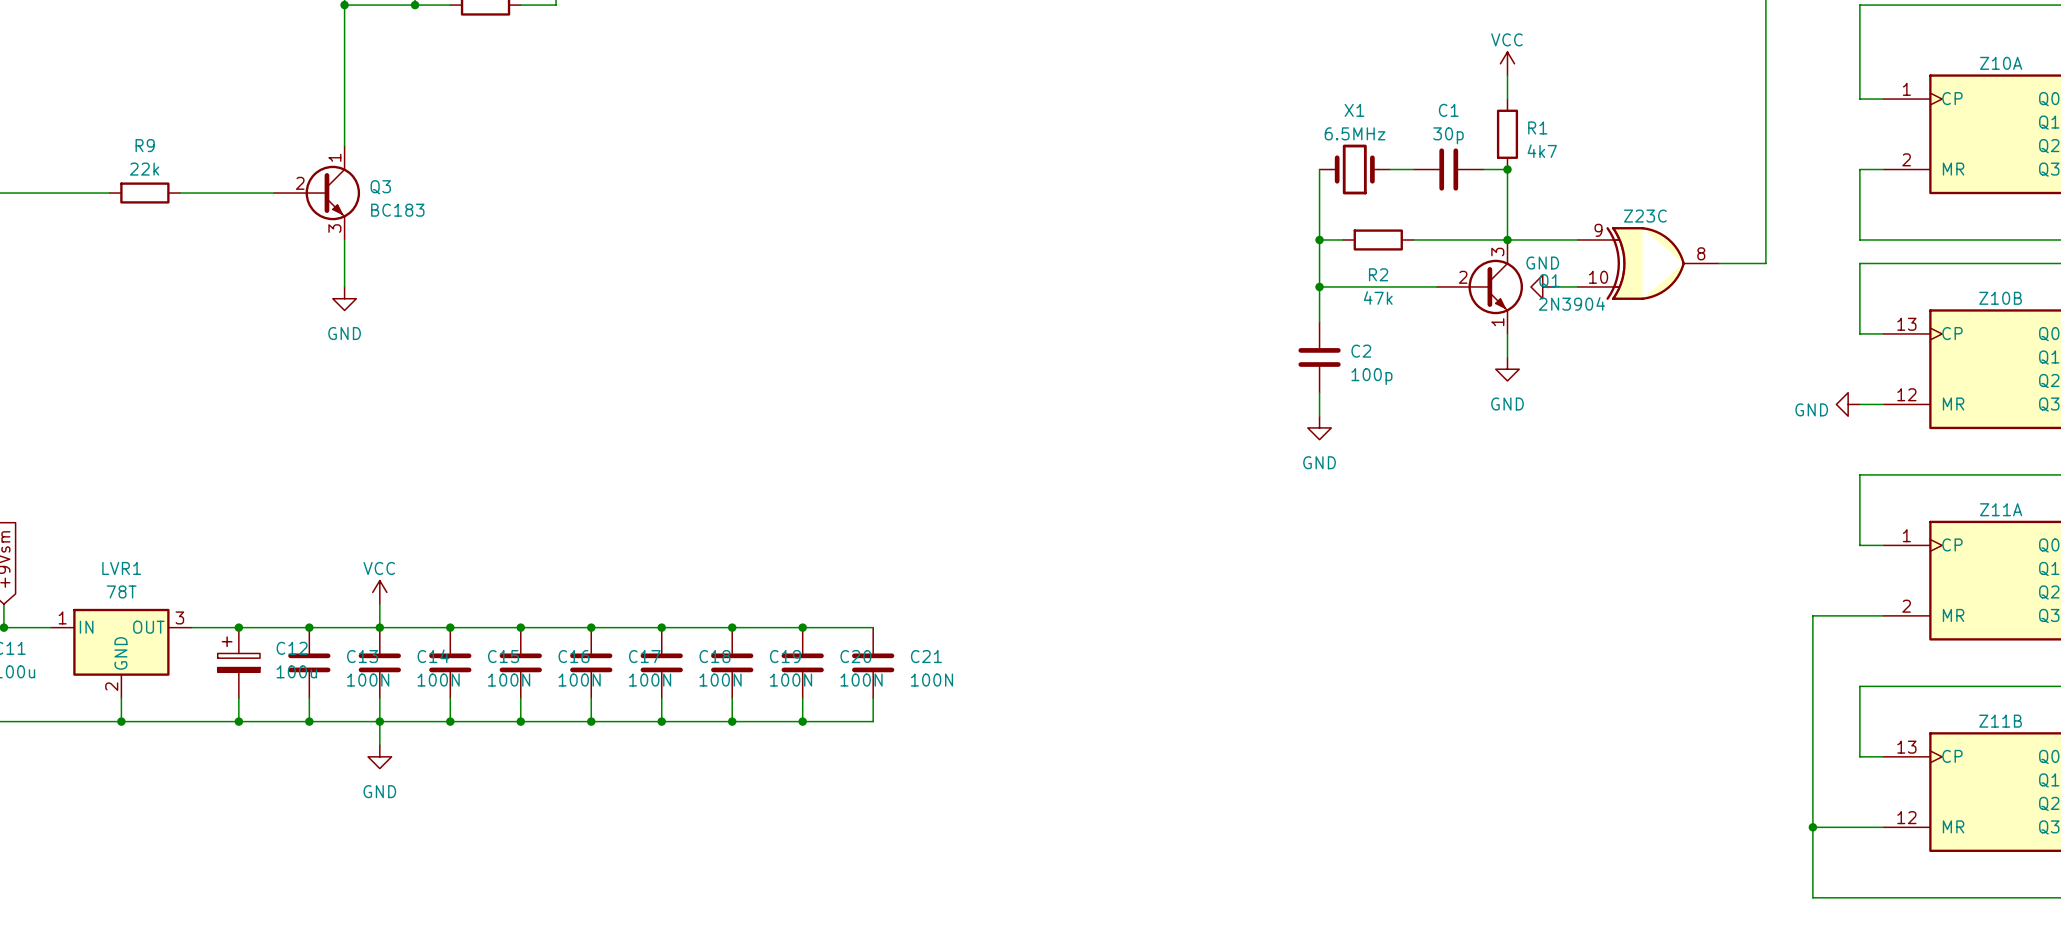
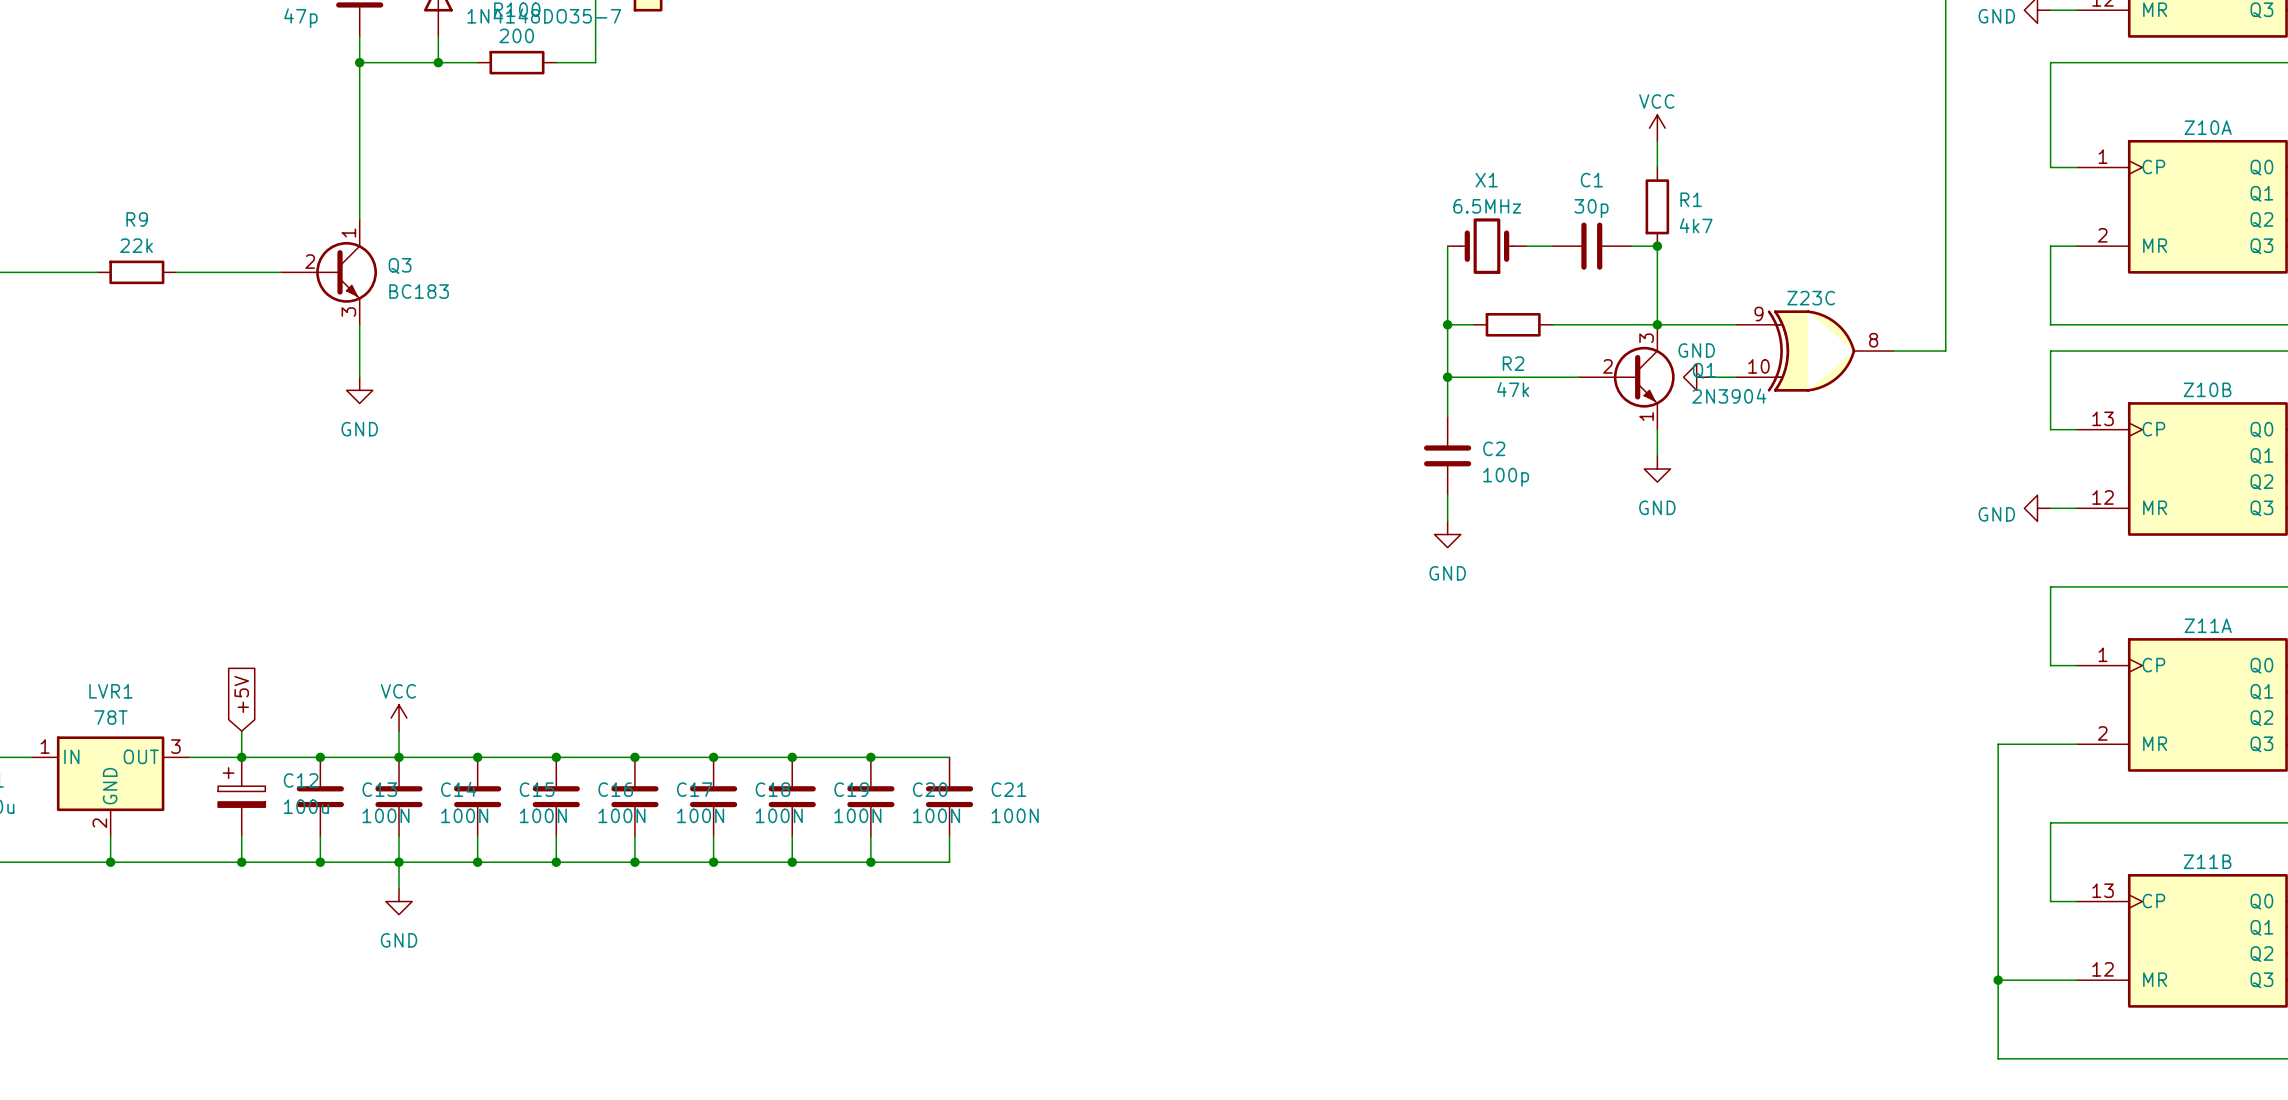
global label: none -> +5V (241, 694)
wire: none -> (241, 731) (241, 757)

